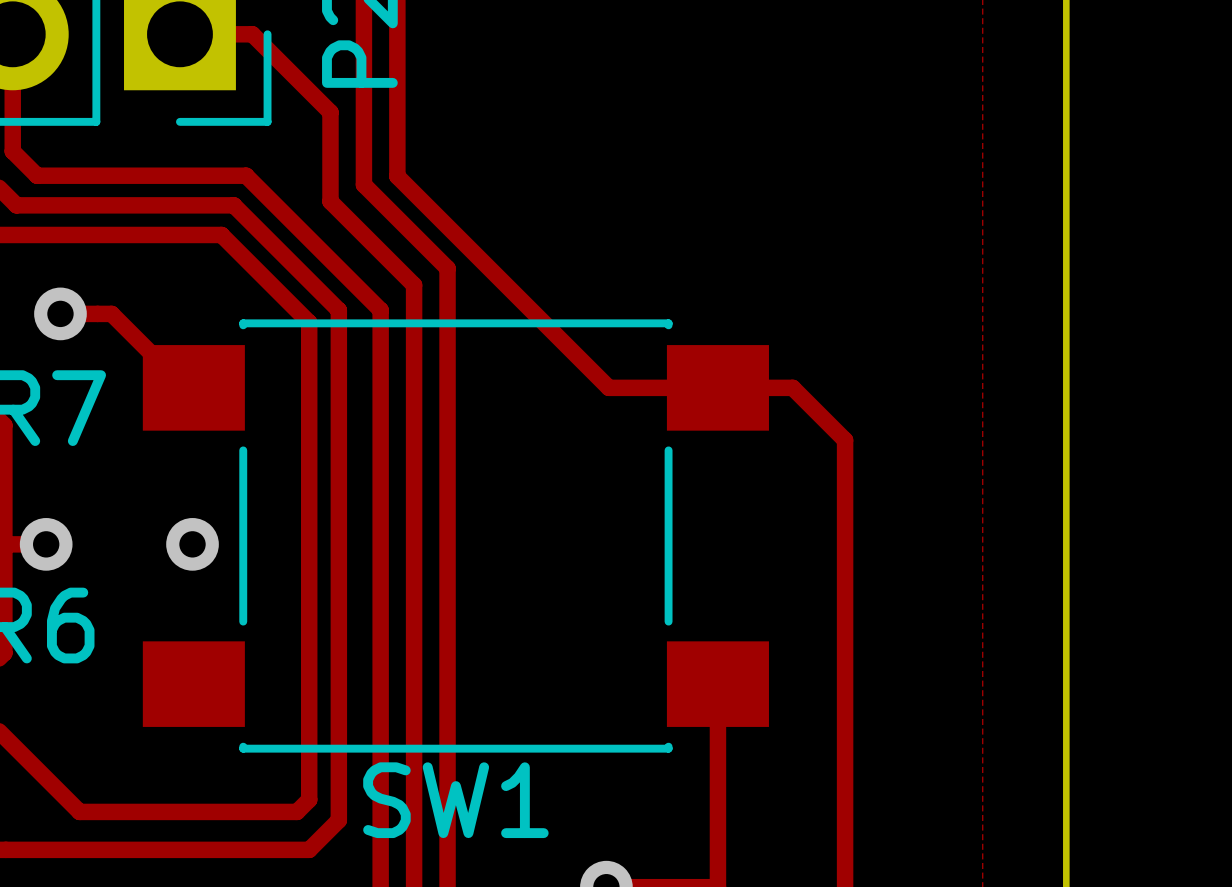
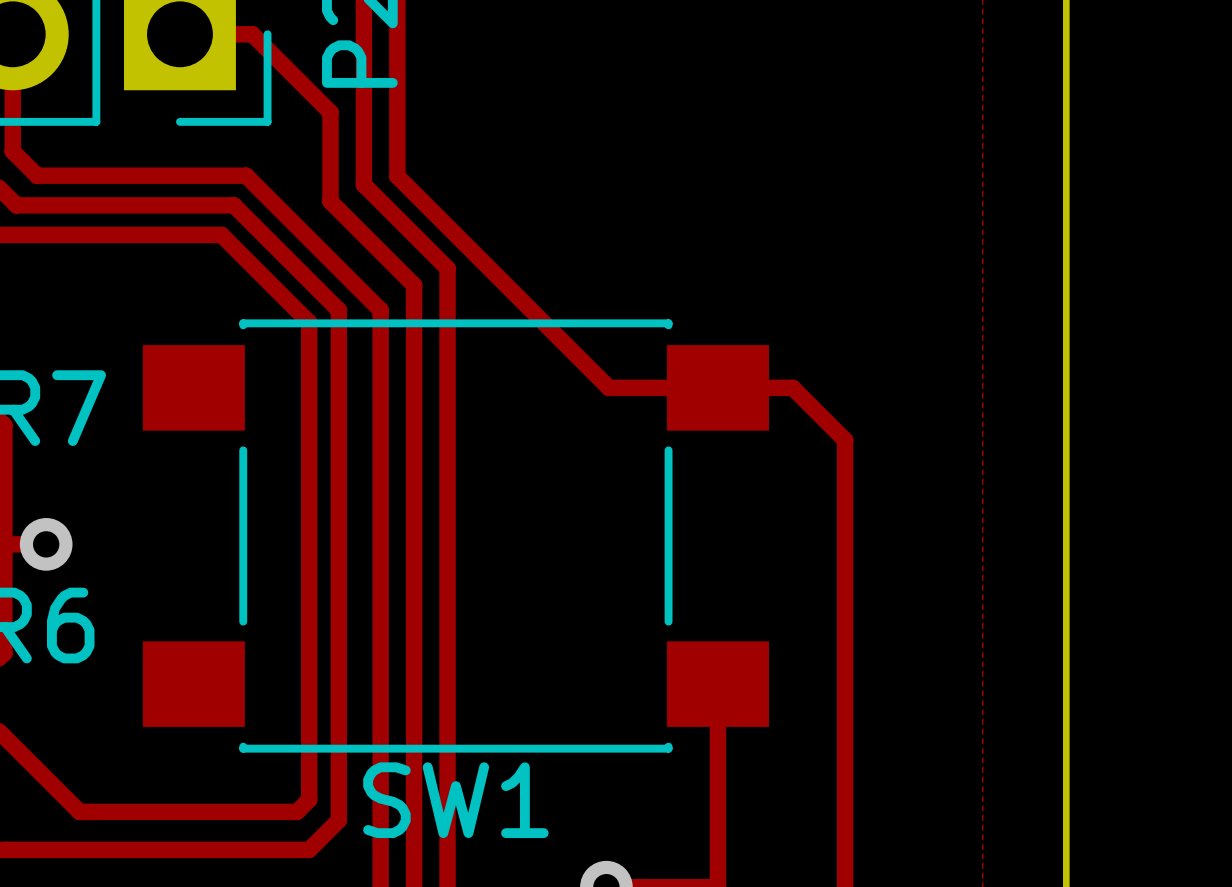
track: (60, 313) (111, 313) (185, 387) (193, 387) -> none
via: (60, 313) -> none
via: (192, 544) -> none

